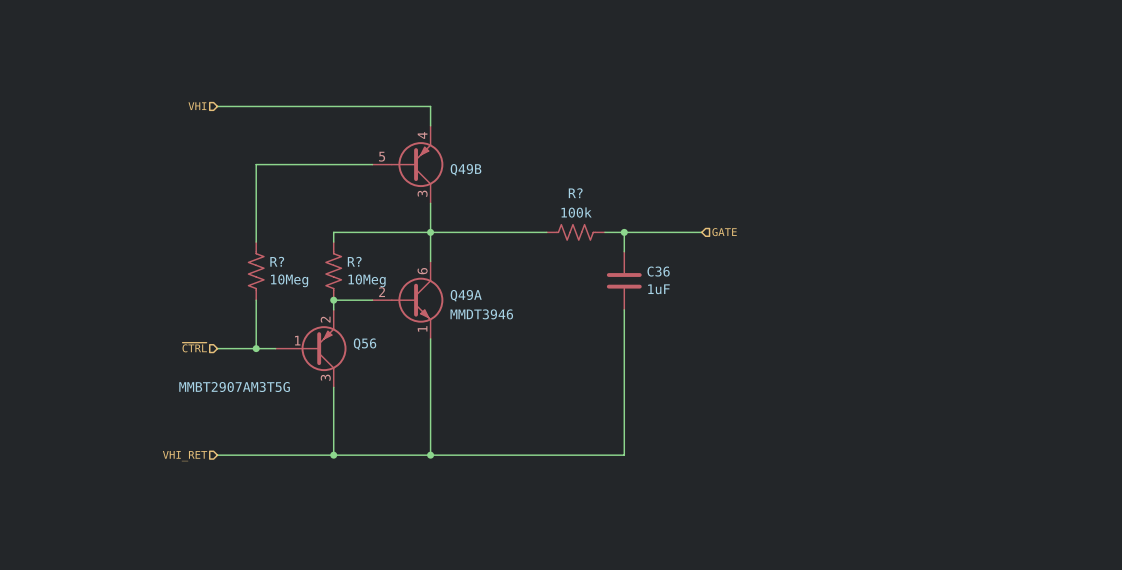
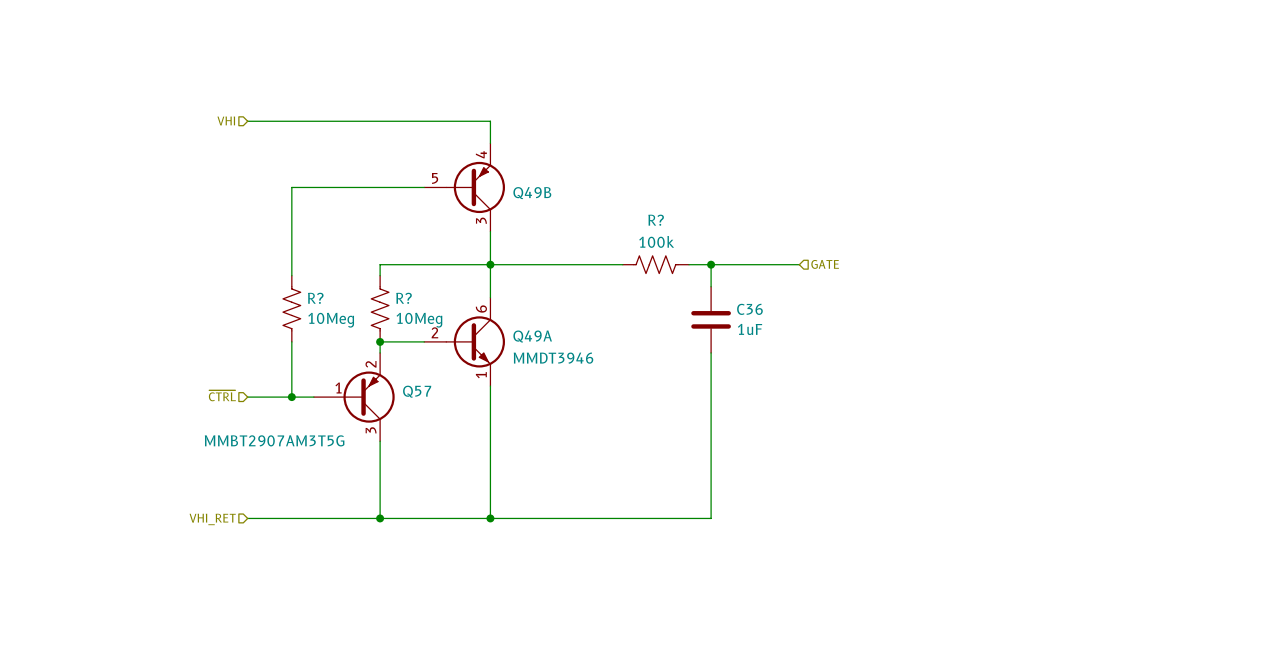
Q56 name: Q56 (365, 344) -> Q57 (417, 391)

